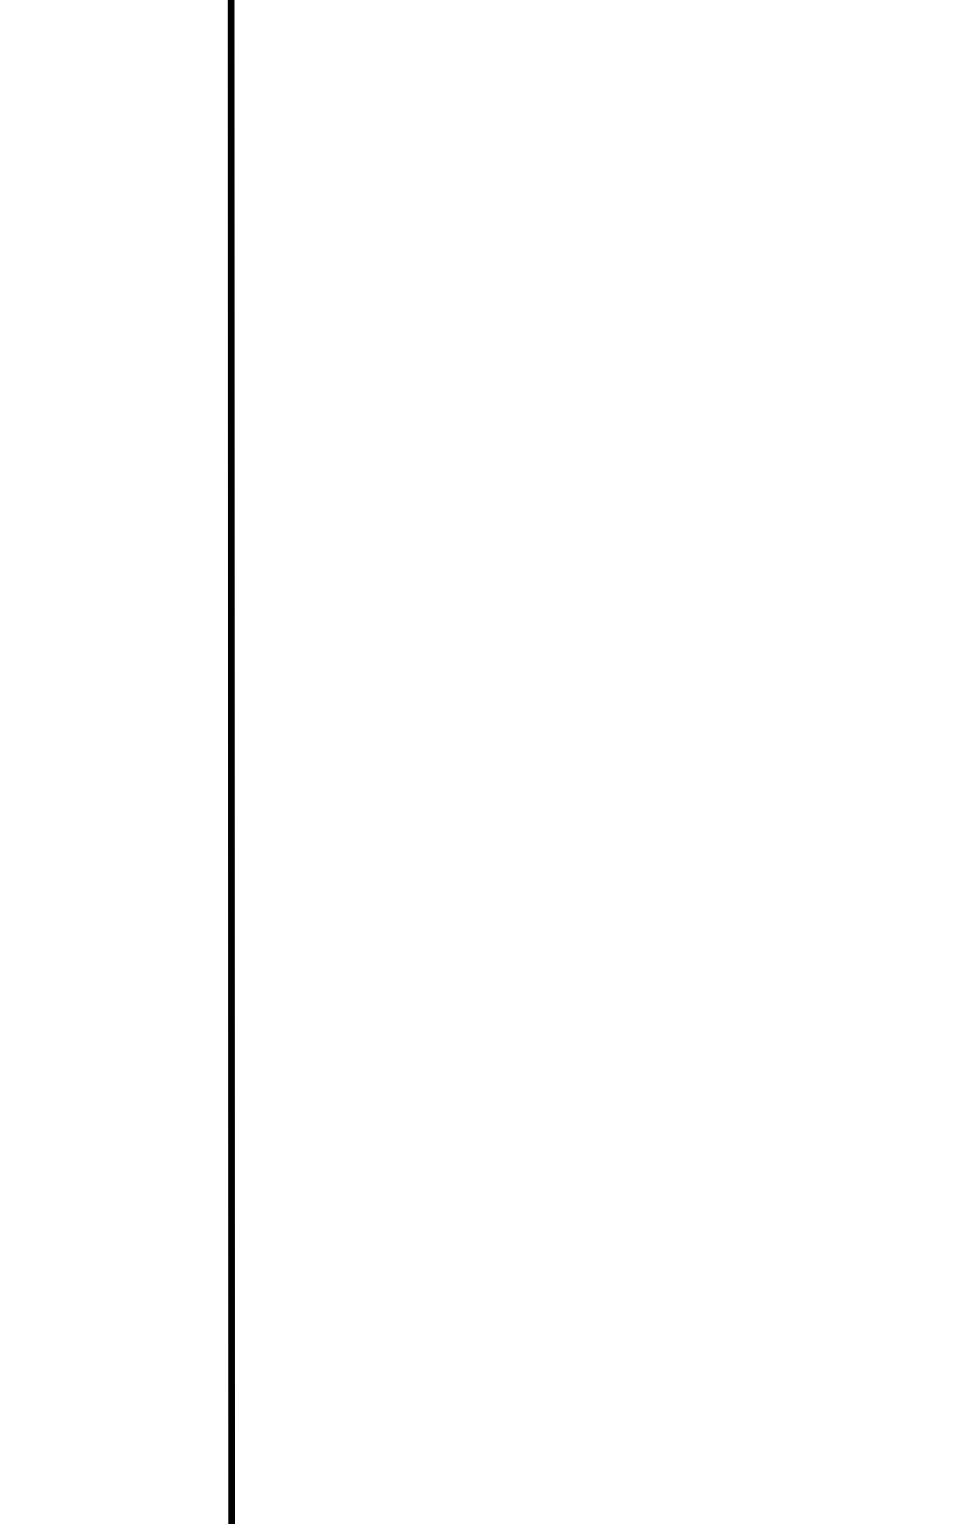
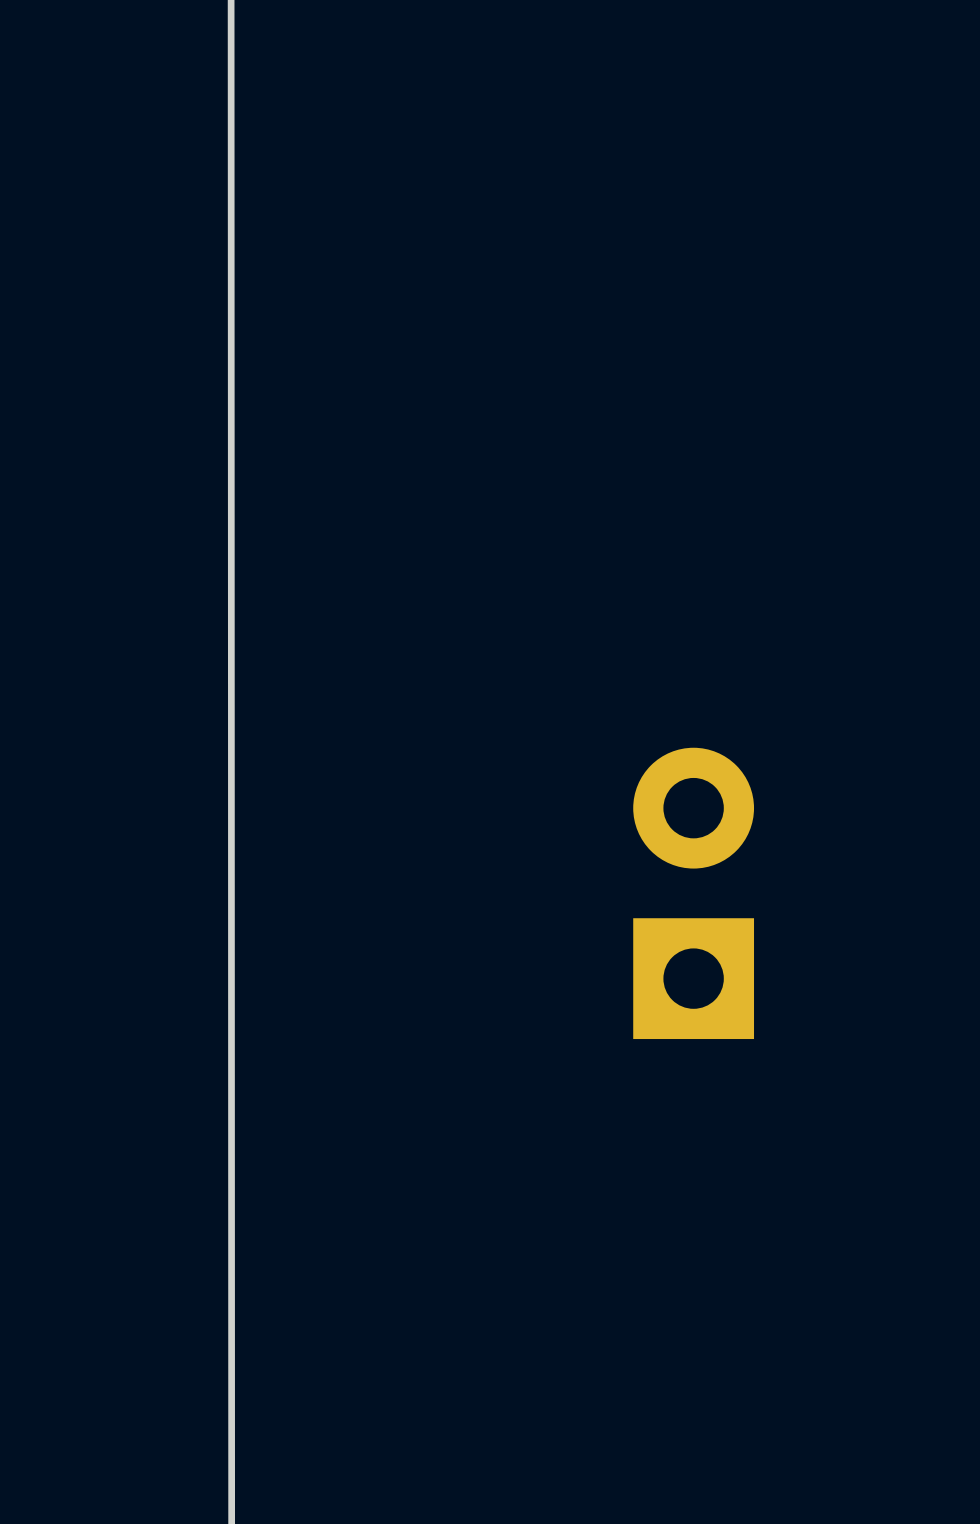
part: none -> (693, 893)

